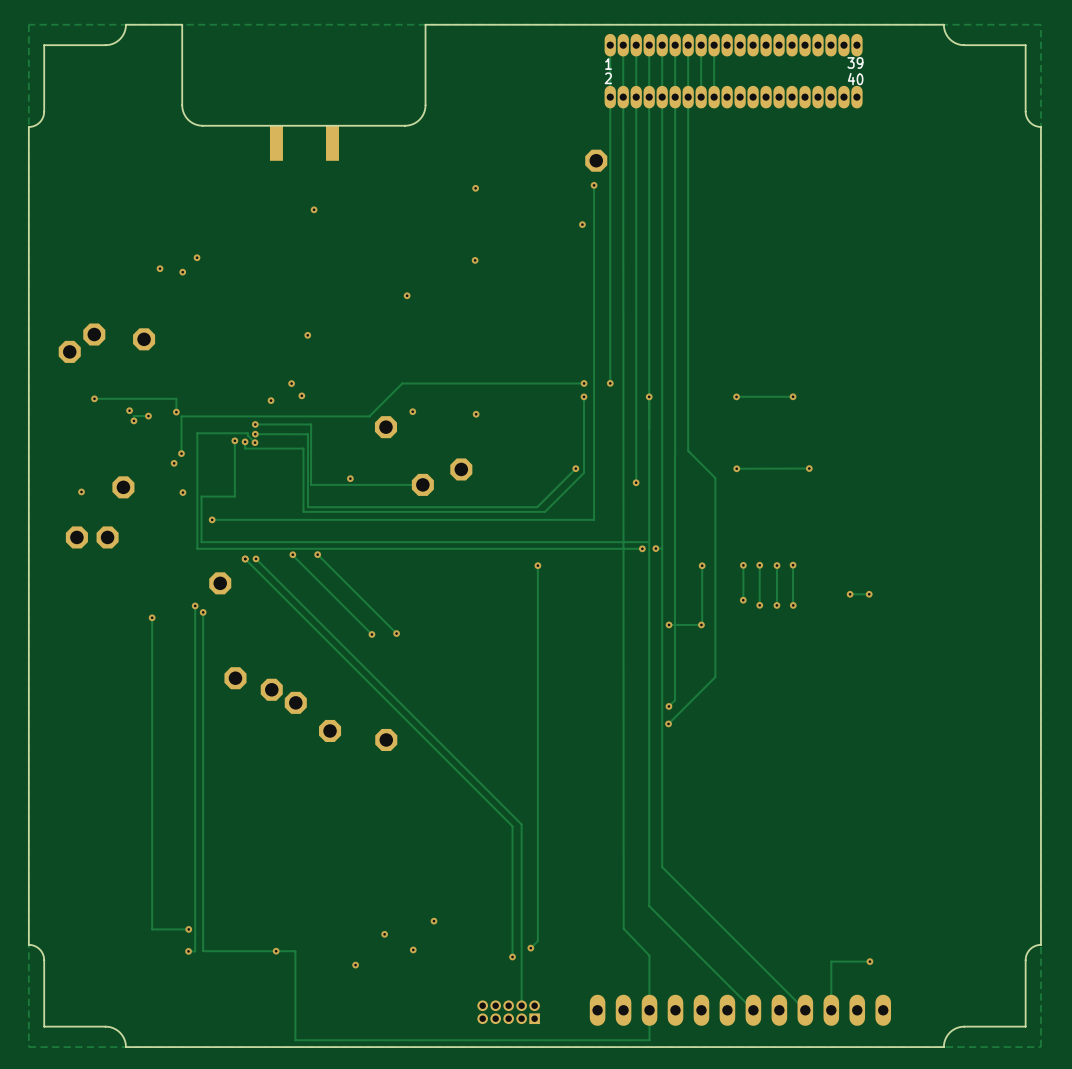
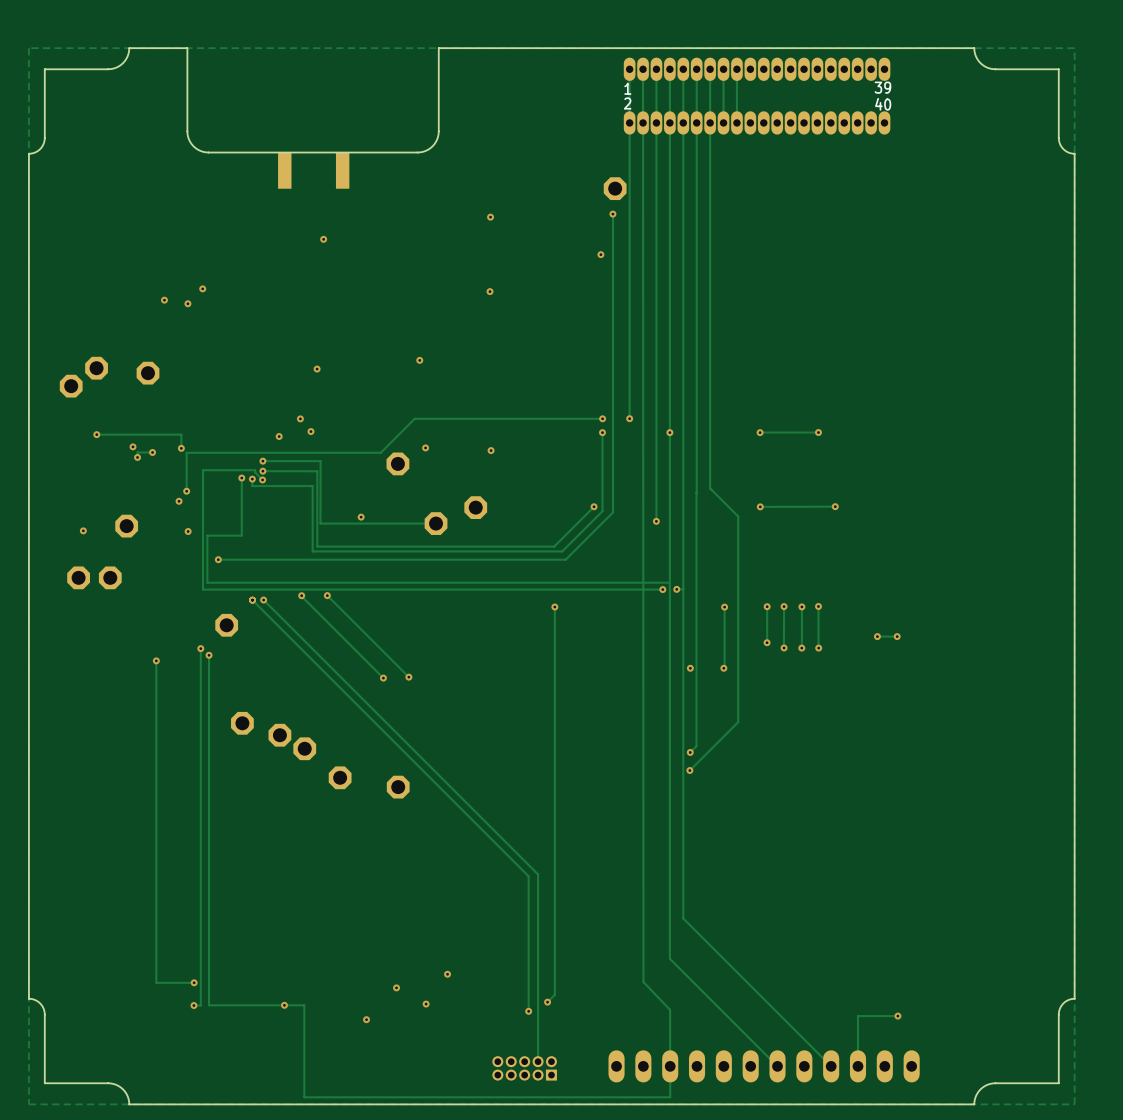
track: (594, 185) (594, 519) (548, 519) -> (613, 214) (613, 512) (565, 559)
via position: (407, 295) -> (419, 360)
track: (701, 624) (669, 624) -> none

